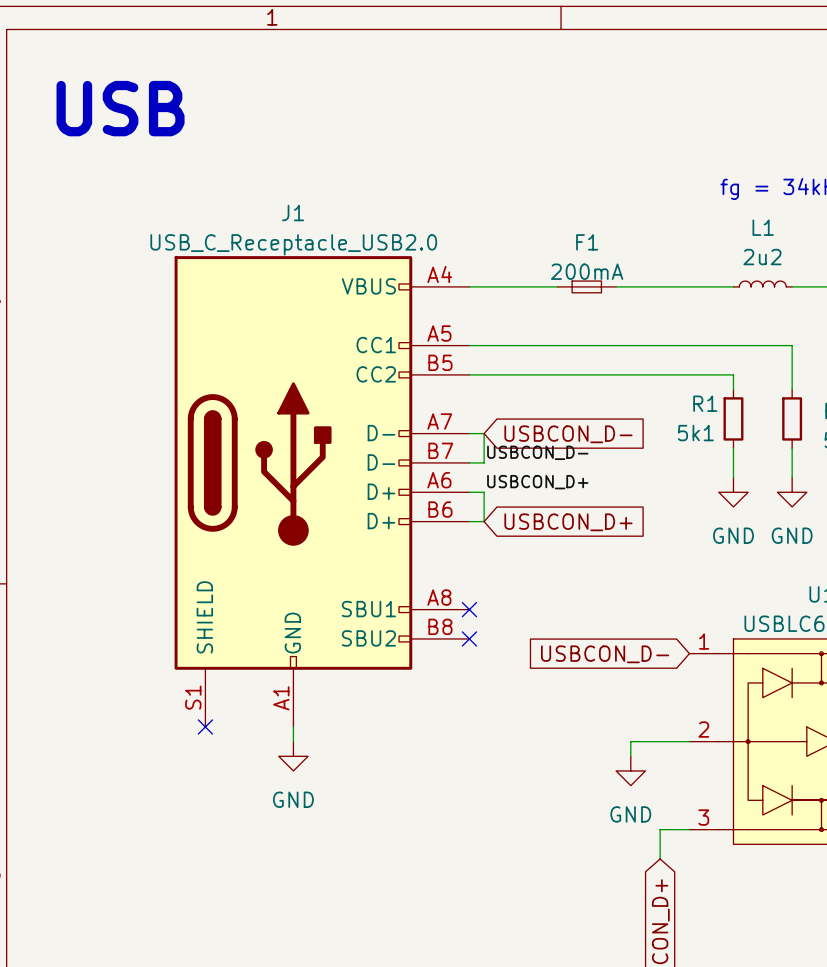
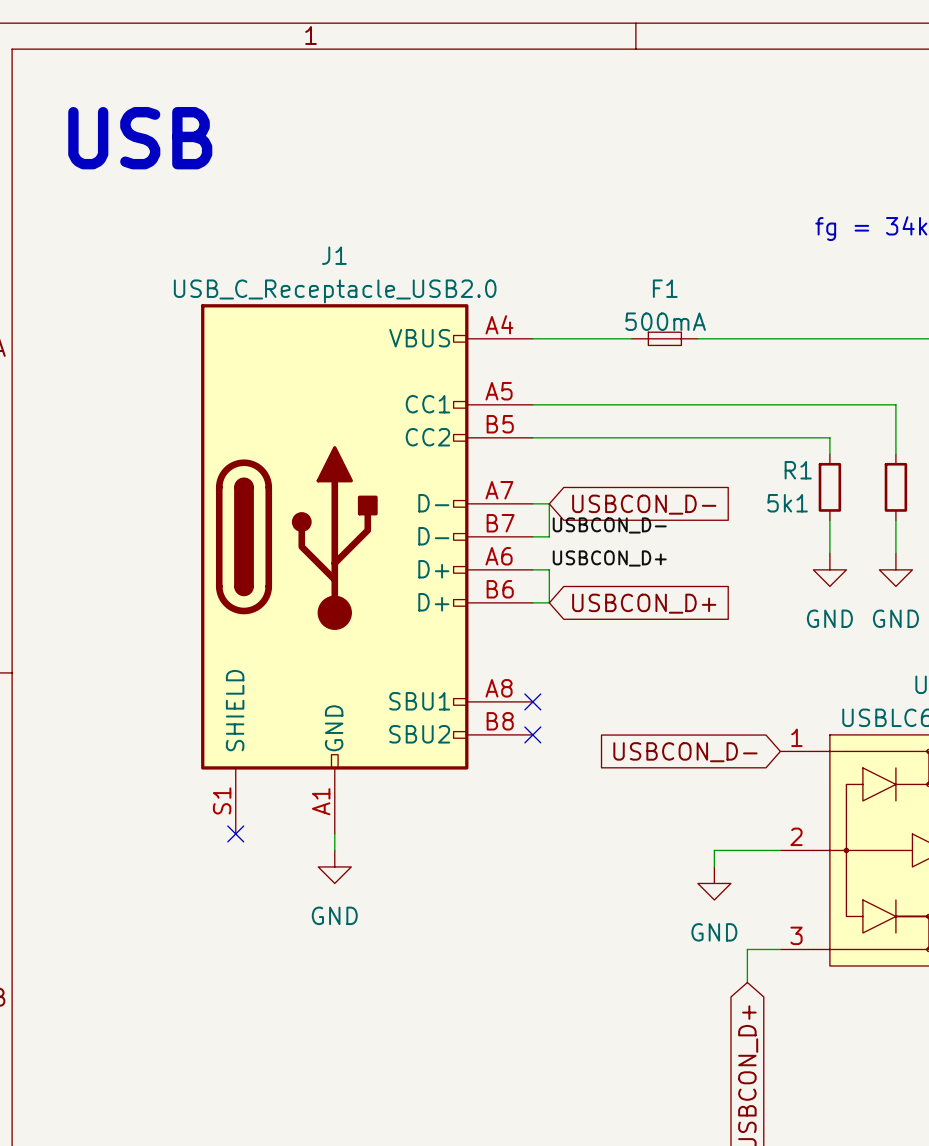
F1 value: 200mA (587, 271) -> 500mA (665, 321)
L1: 2u2 (762, 284) -> none
wire: none -> (829, 338) (895, 338)

